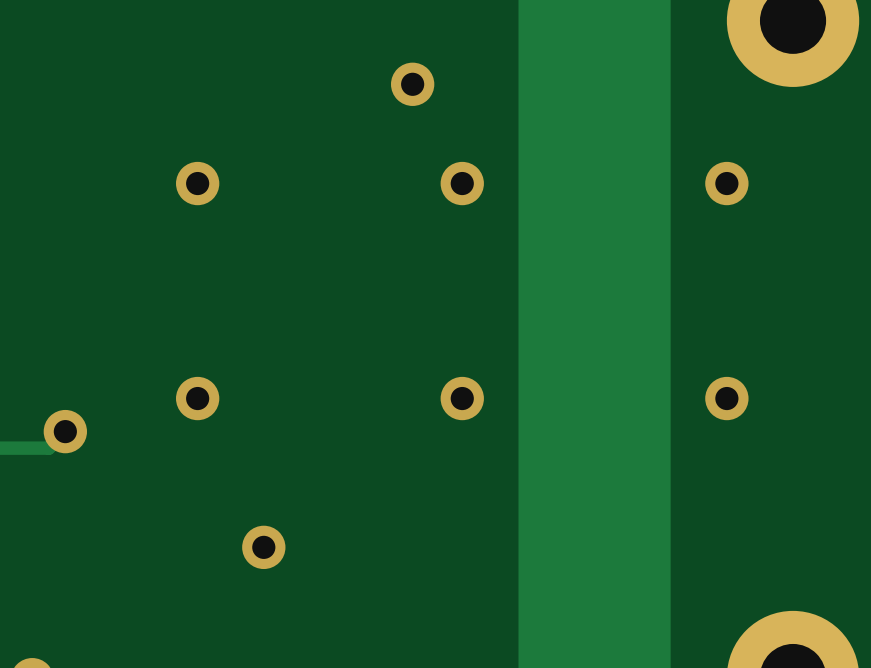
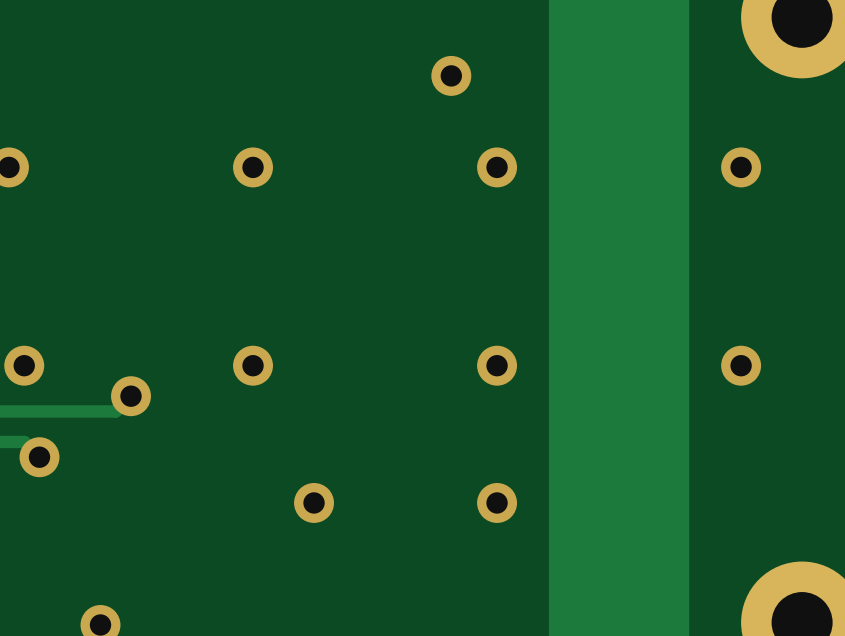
via: none -> (497, 502)

